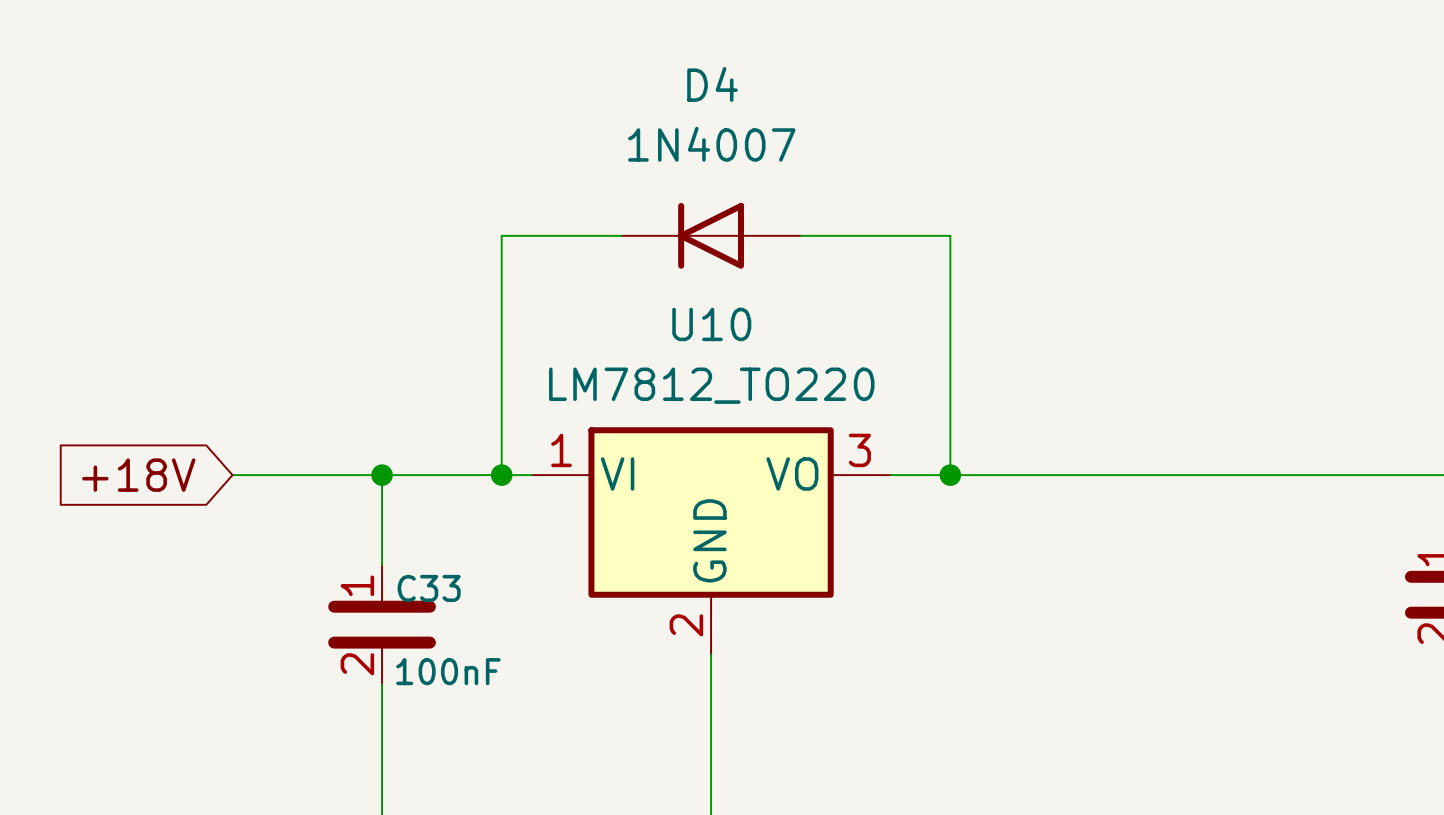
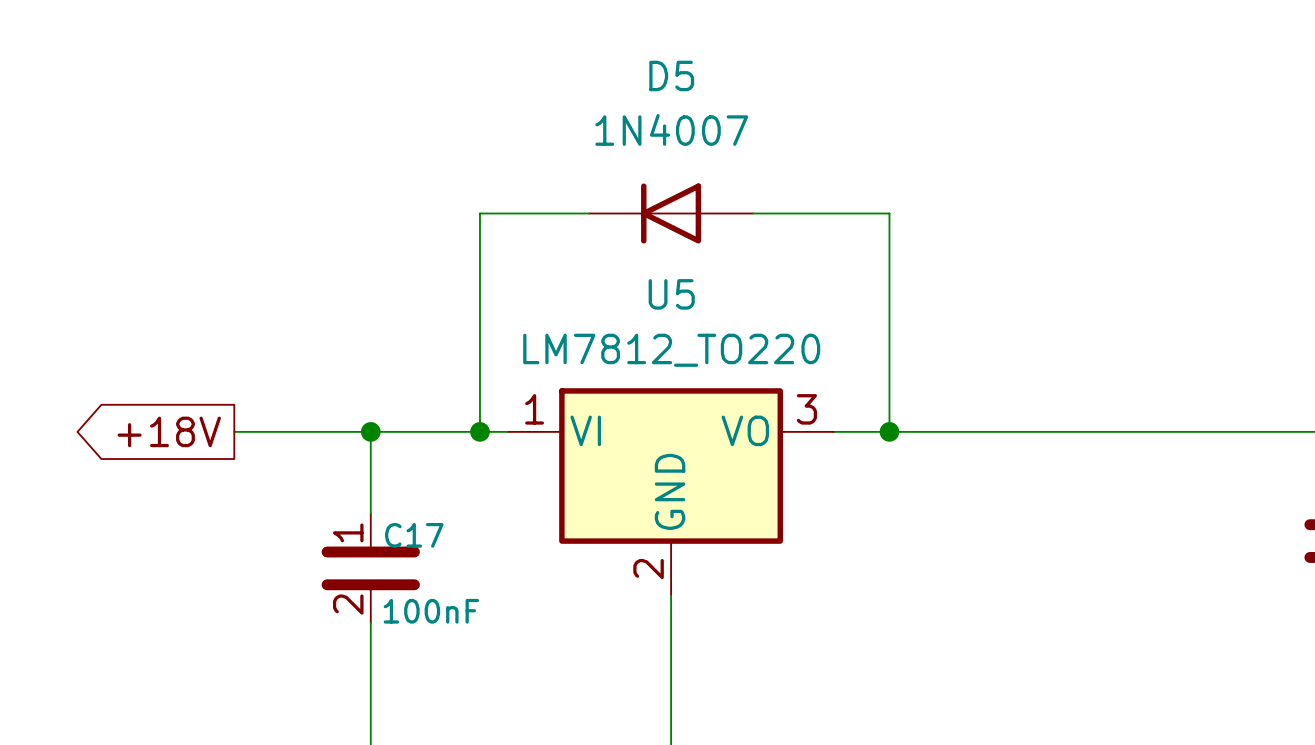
D4 name: D4 (712, 84) -> D5 (671, 75)
U10 name: U10 (711, 324) -> U5 (671, 294)
global label shape: input (138, 475) -> output (169, 431)
C33 name: C33 (429, 588) -> C17 (414, 535)

